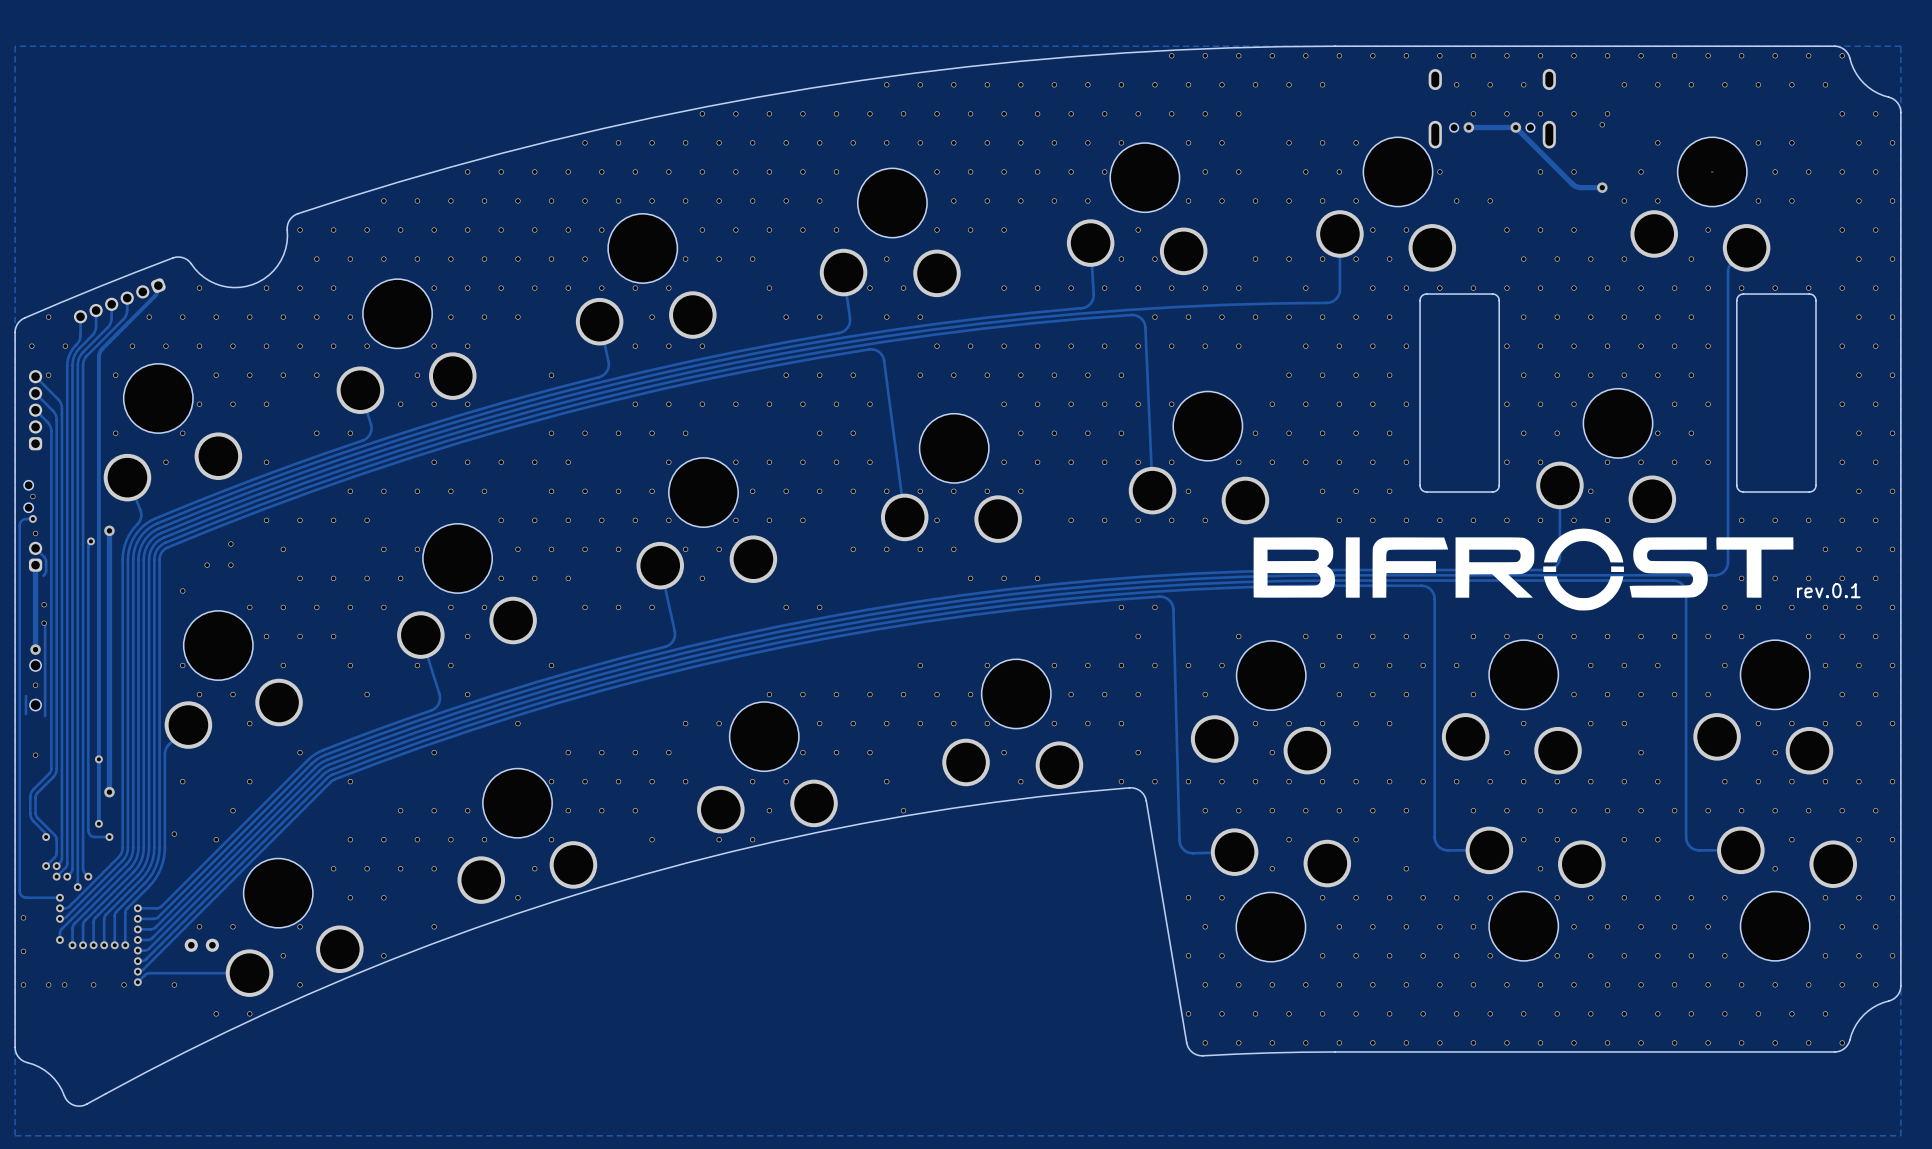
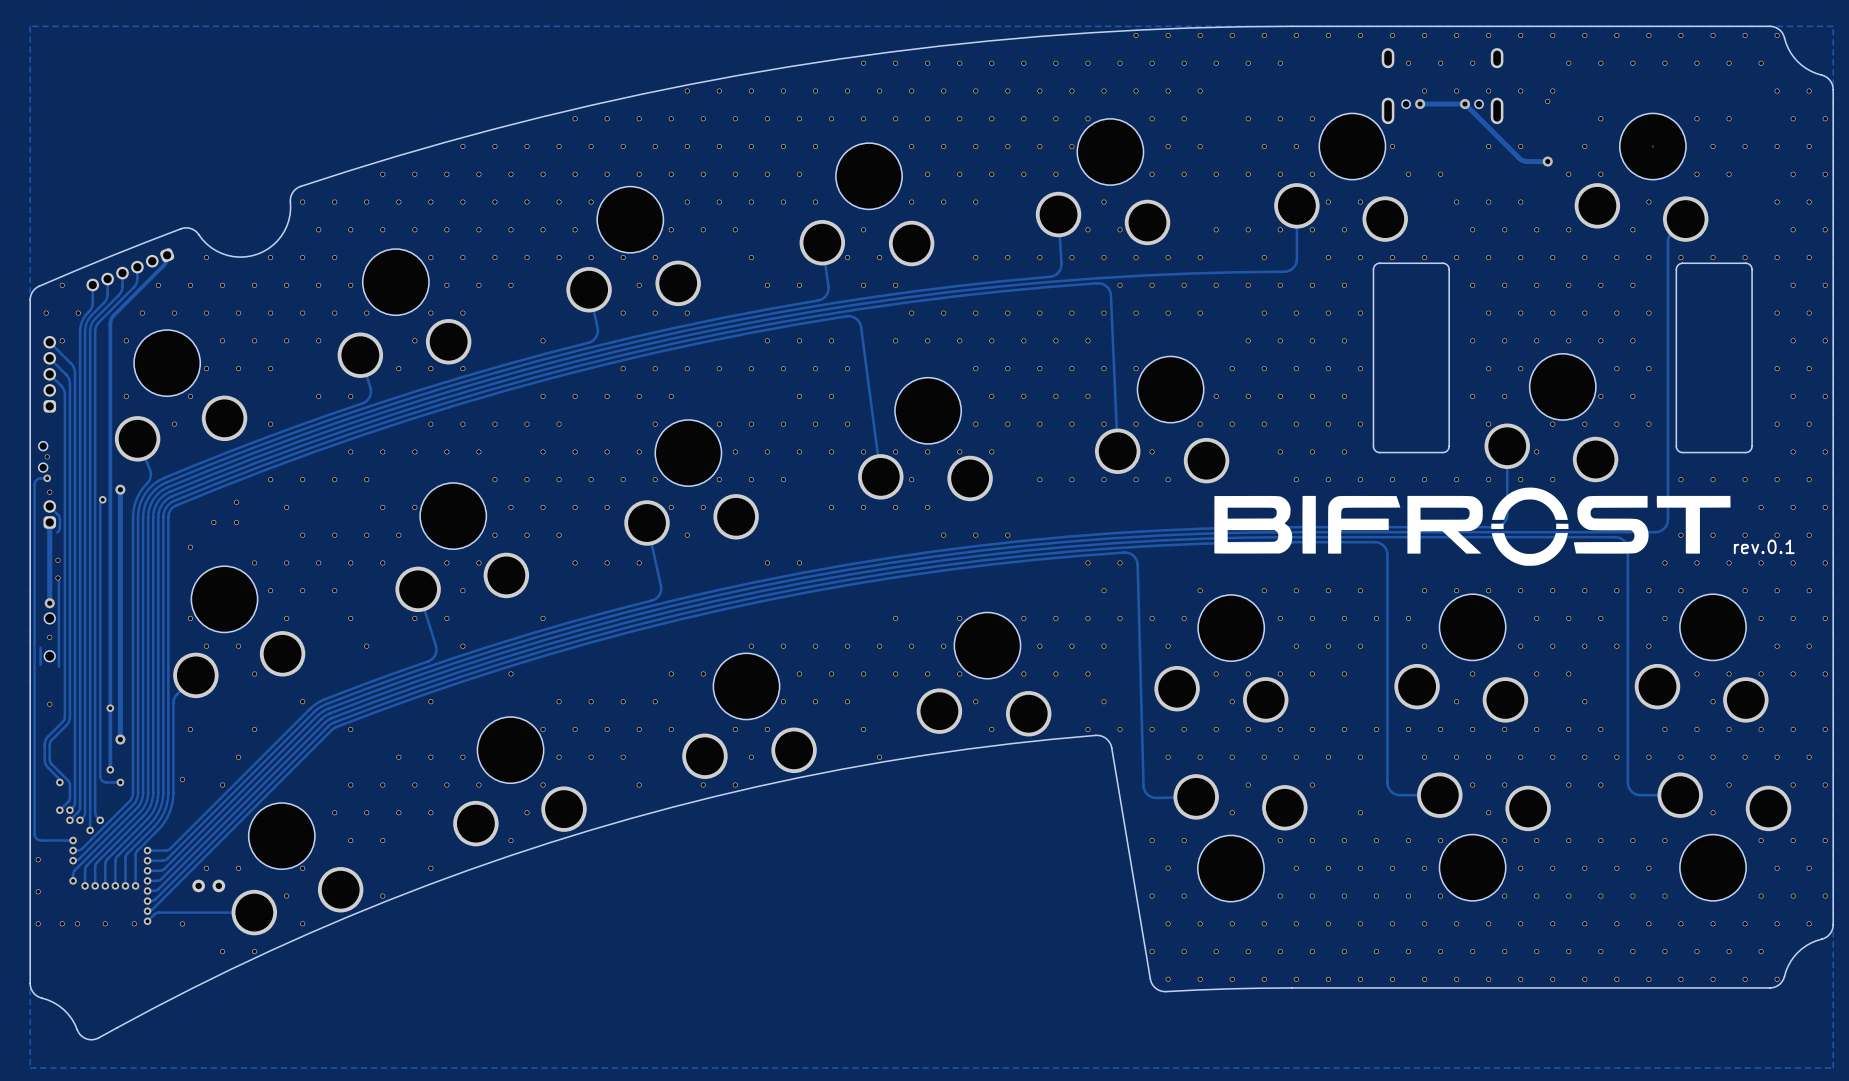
via: (1506, 346) -> none
via: (1506, 404) -> none
via: (1506, 462) -> none

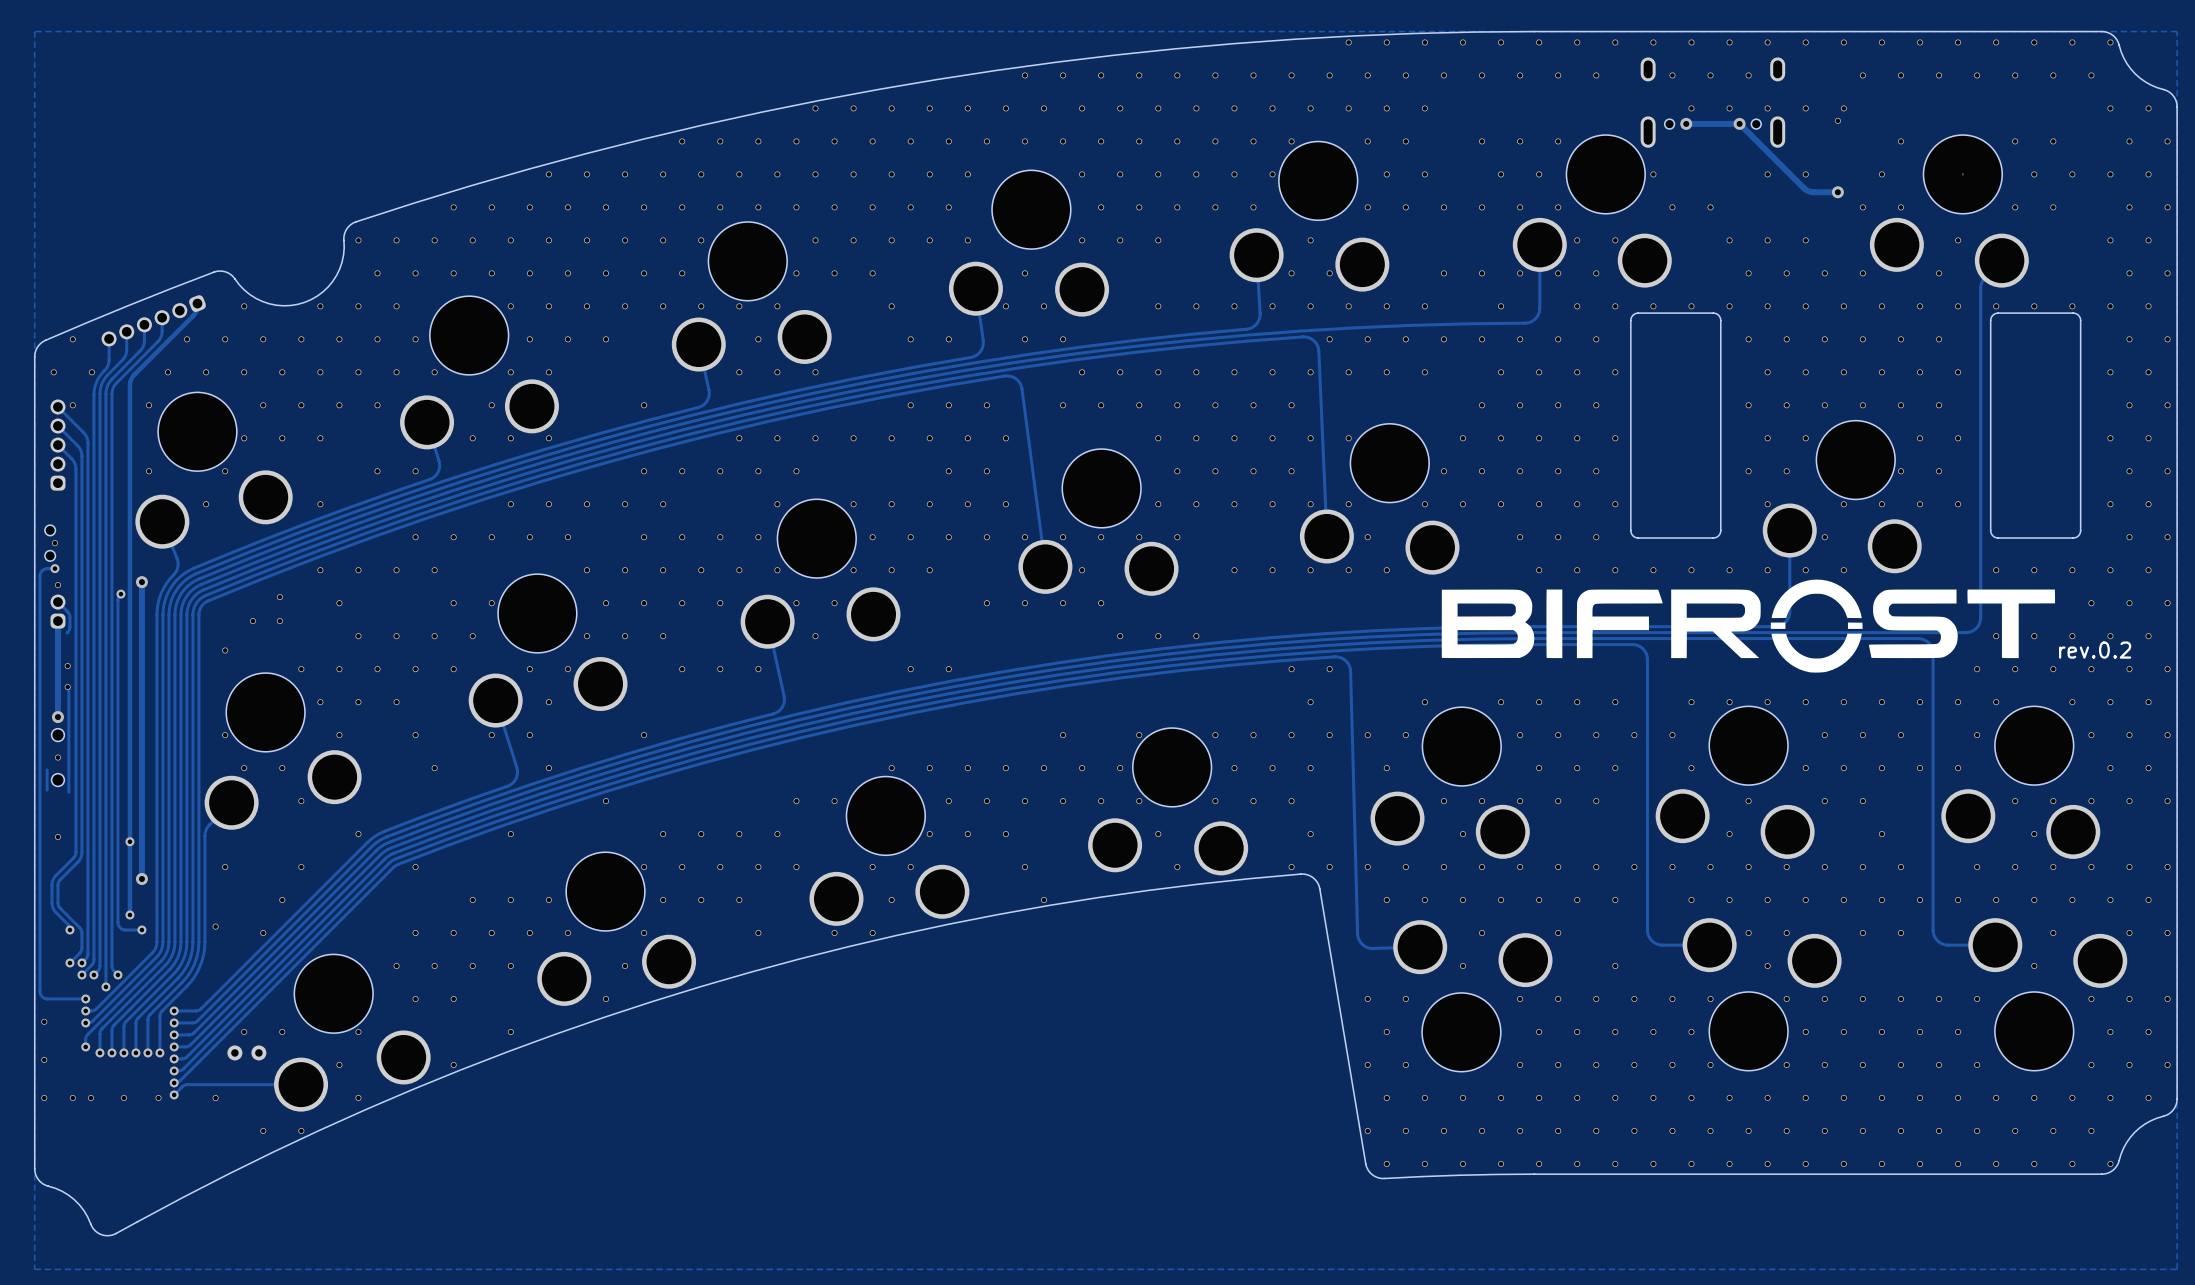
via: none -> (1558, 75)
via: none -> (1596, 75)
text: rev.0.1 (1764, 546) -> rev.0.2 (2095, 650)

